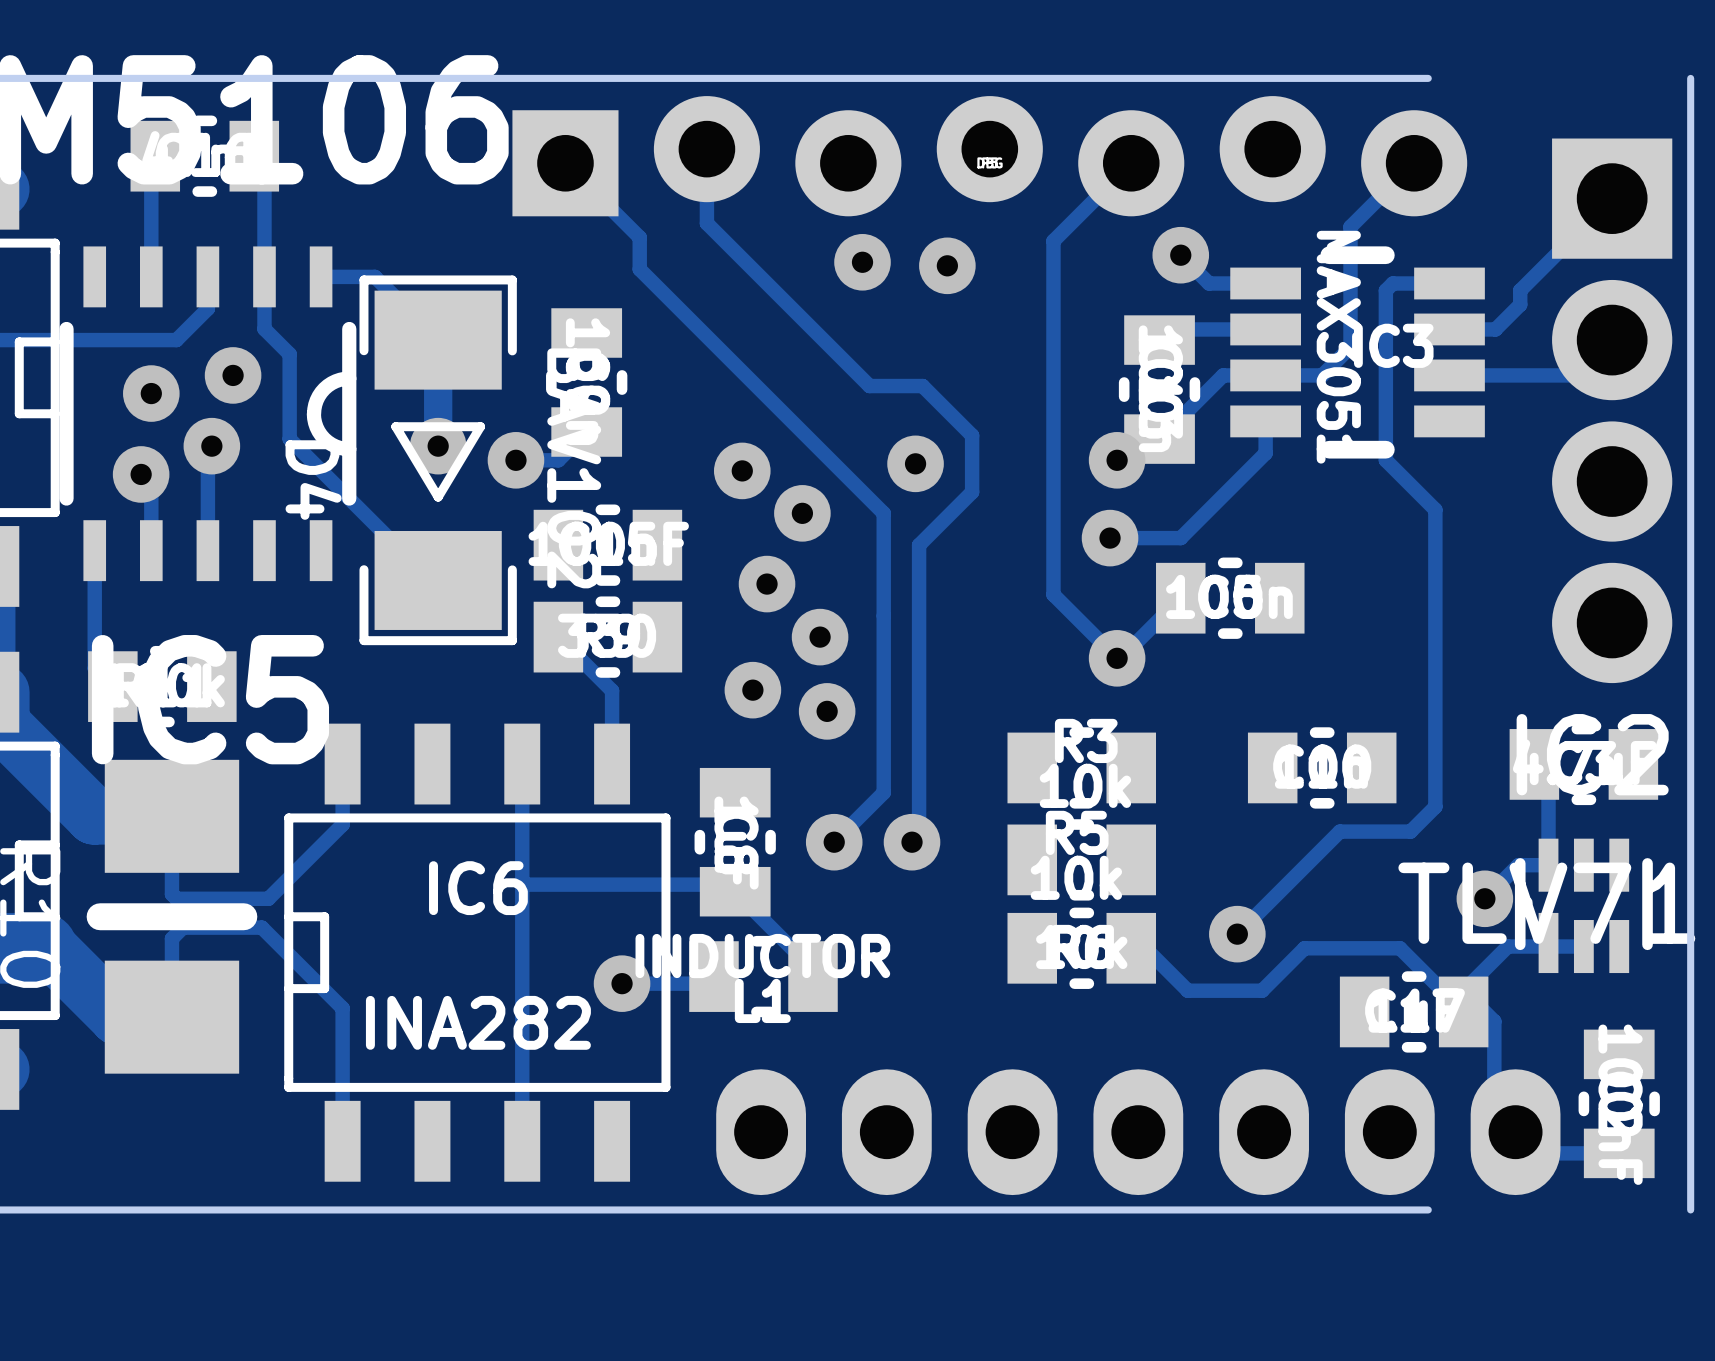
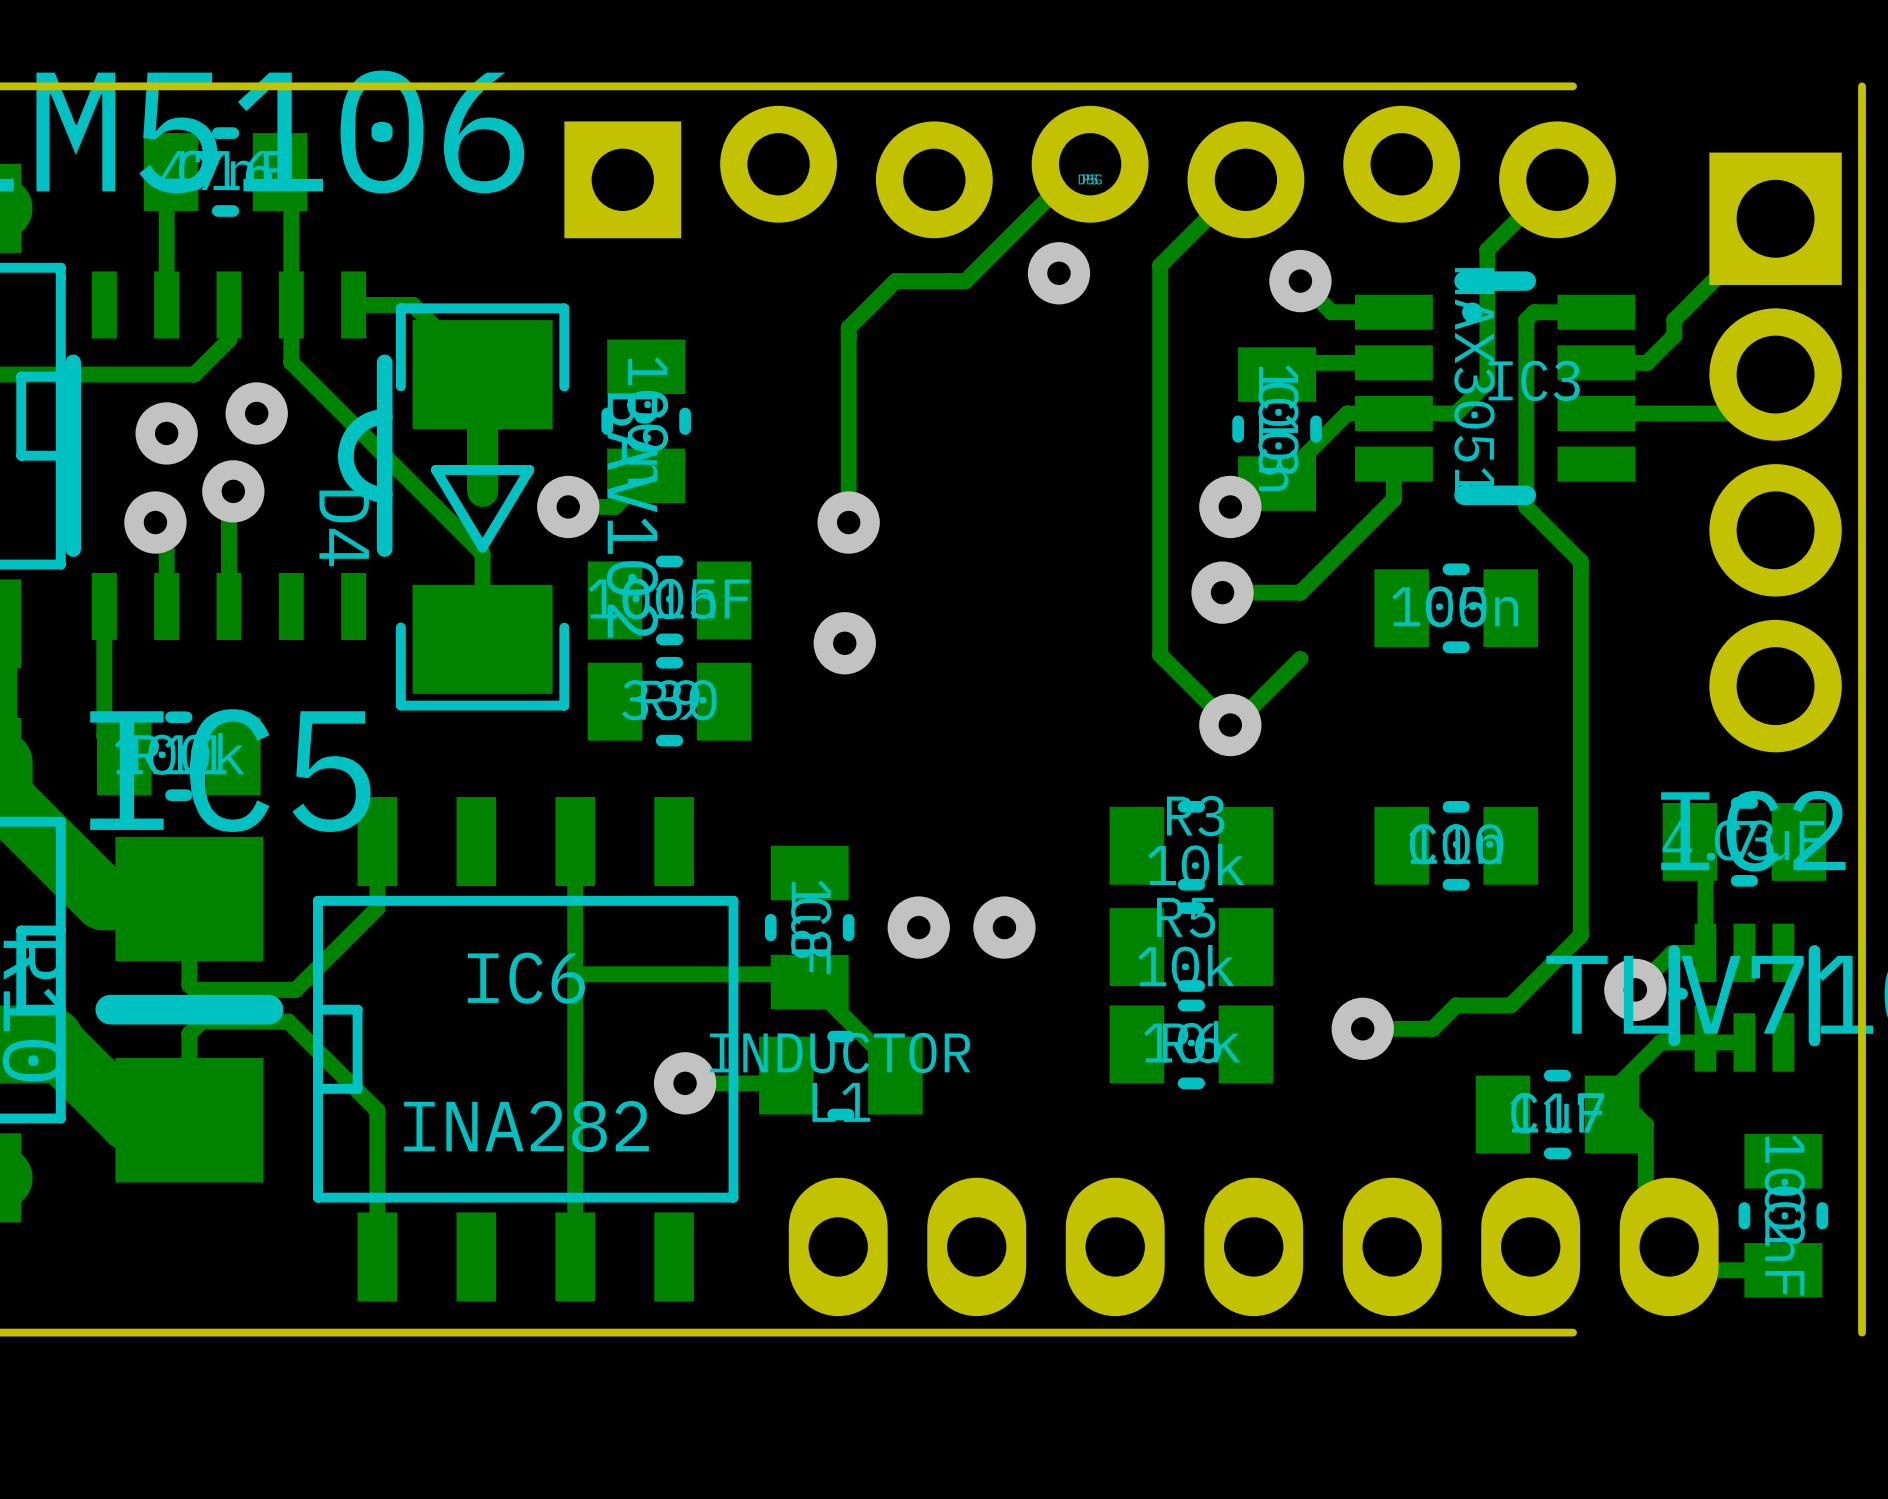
track: (706, 149) (706, 223) (869, 386) (922, 386) (972, 435) (972, 492) (919, 545) (919, 835) (912, 842) -> none
track: none -> (1090, 164) (1082, 164) (965, 281) (895, 281) (848, 327) (848, 522)
track: (565, 163) (639, 237) (639, 269) (883, 513) (883, 792) (834, 842) -> none
via: (862, 262) -> none
via position: (947, 265) -> (1058, 273)
track: (289, 354) (289, 439) (431, 580) (438, 580) -> (319, 390) (482, 553) (482, 639)
via: (438, 446) -> none
via: (915, 463) -> none
via: (742, 470) -> none
via: none -> (848, 522)
via: (802, 513) -> none
part position: (1230, 598) -> (1456, 608)
track: (558, 637) (612, 690) (612, 764) -> none
via: (820, 637) -> none
via: (752, 690) -> none
via: (827, 711) -> none
track: (1435, 806) (1410, 831) (1339, 831) (1237, 934) -> (1580, 888) (1580, 935) (1510, 1005) (1456, 1005) (1432, 1028) (1362, 1028)
track: (1138, 941) (1187, 990) (1262, 990) (1304, 948) (1400, 948) (1463, 1011) -> none

